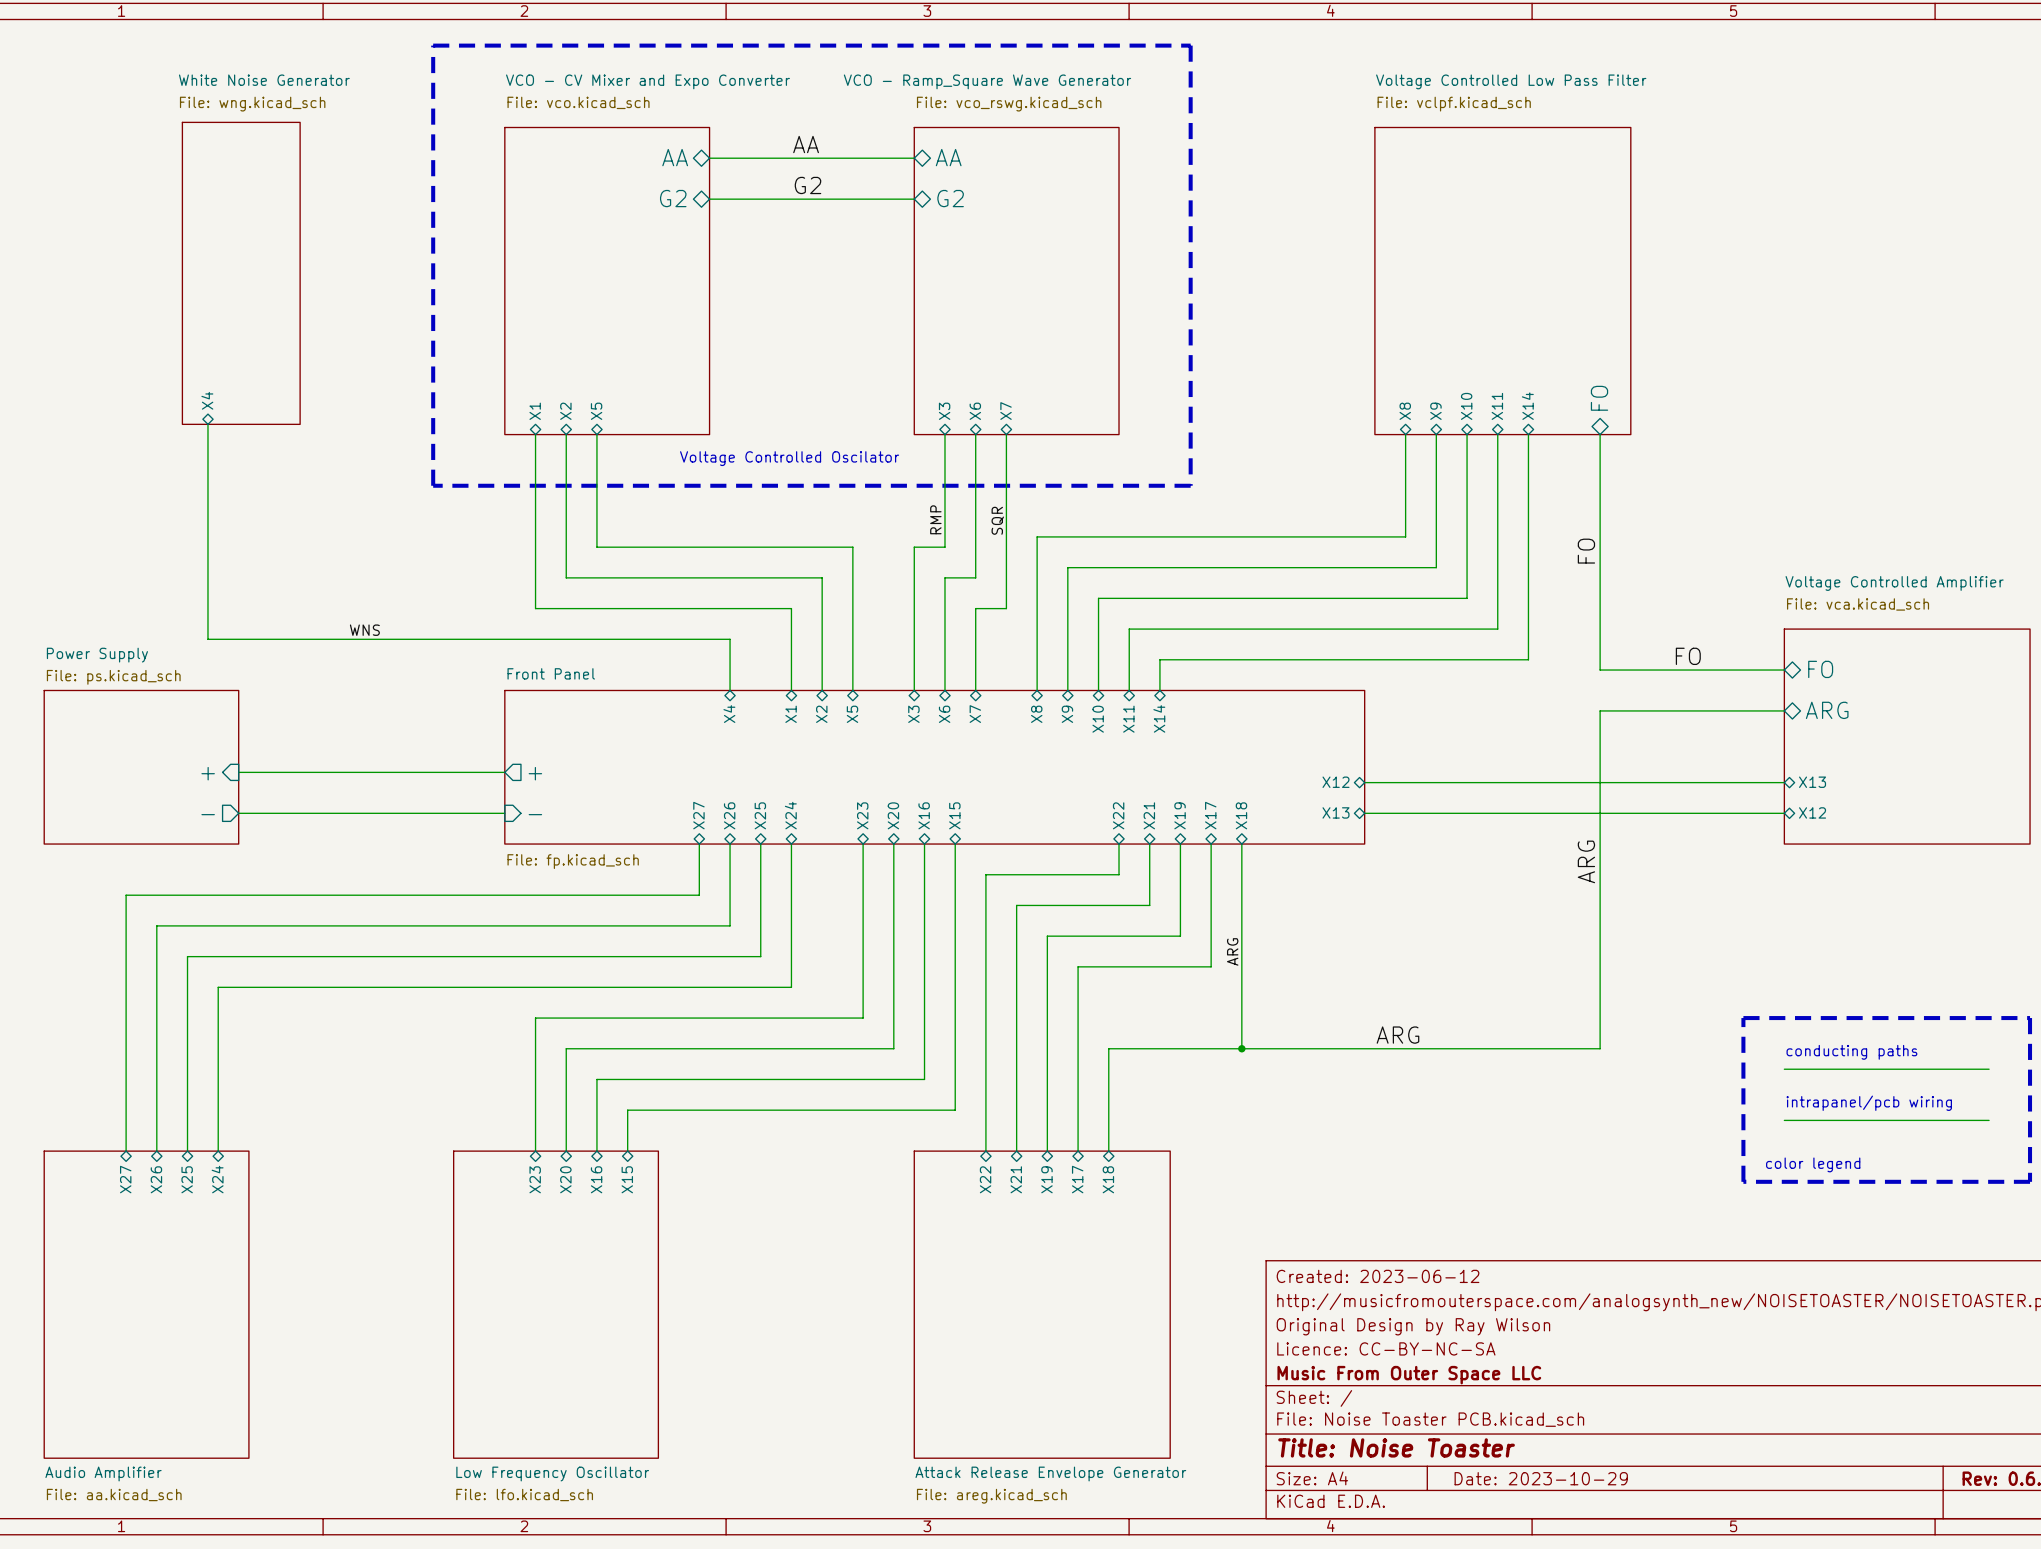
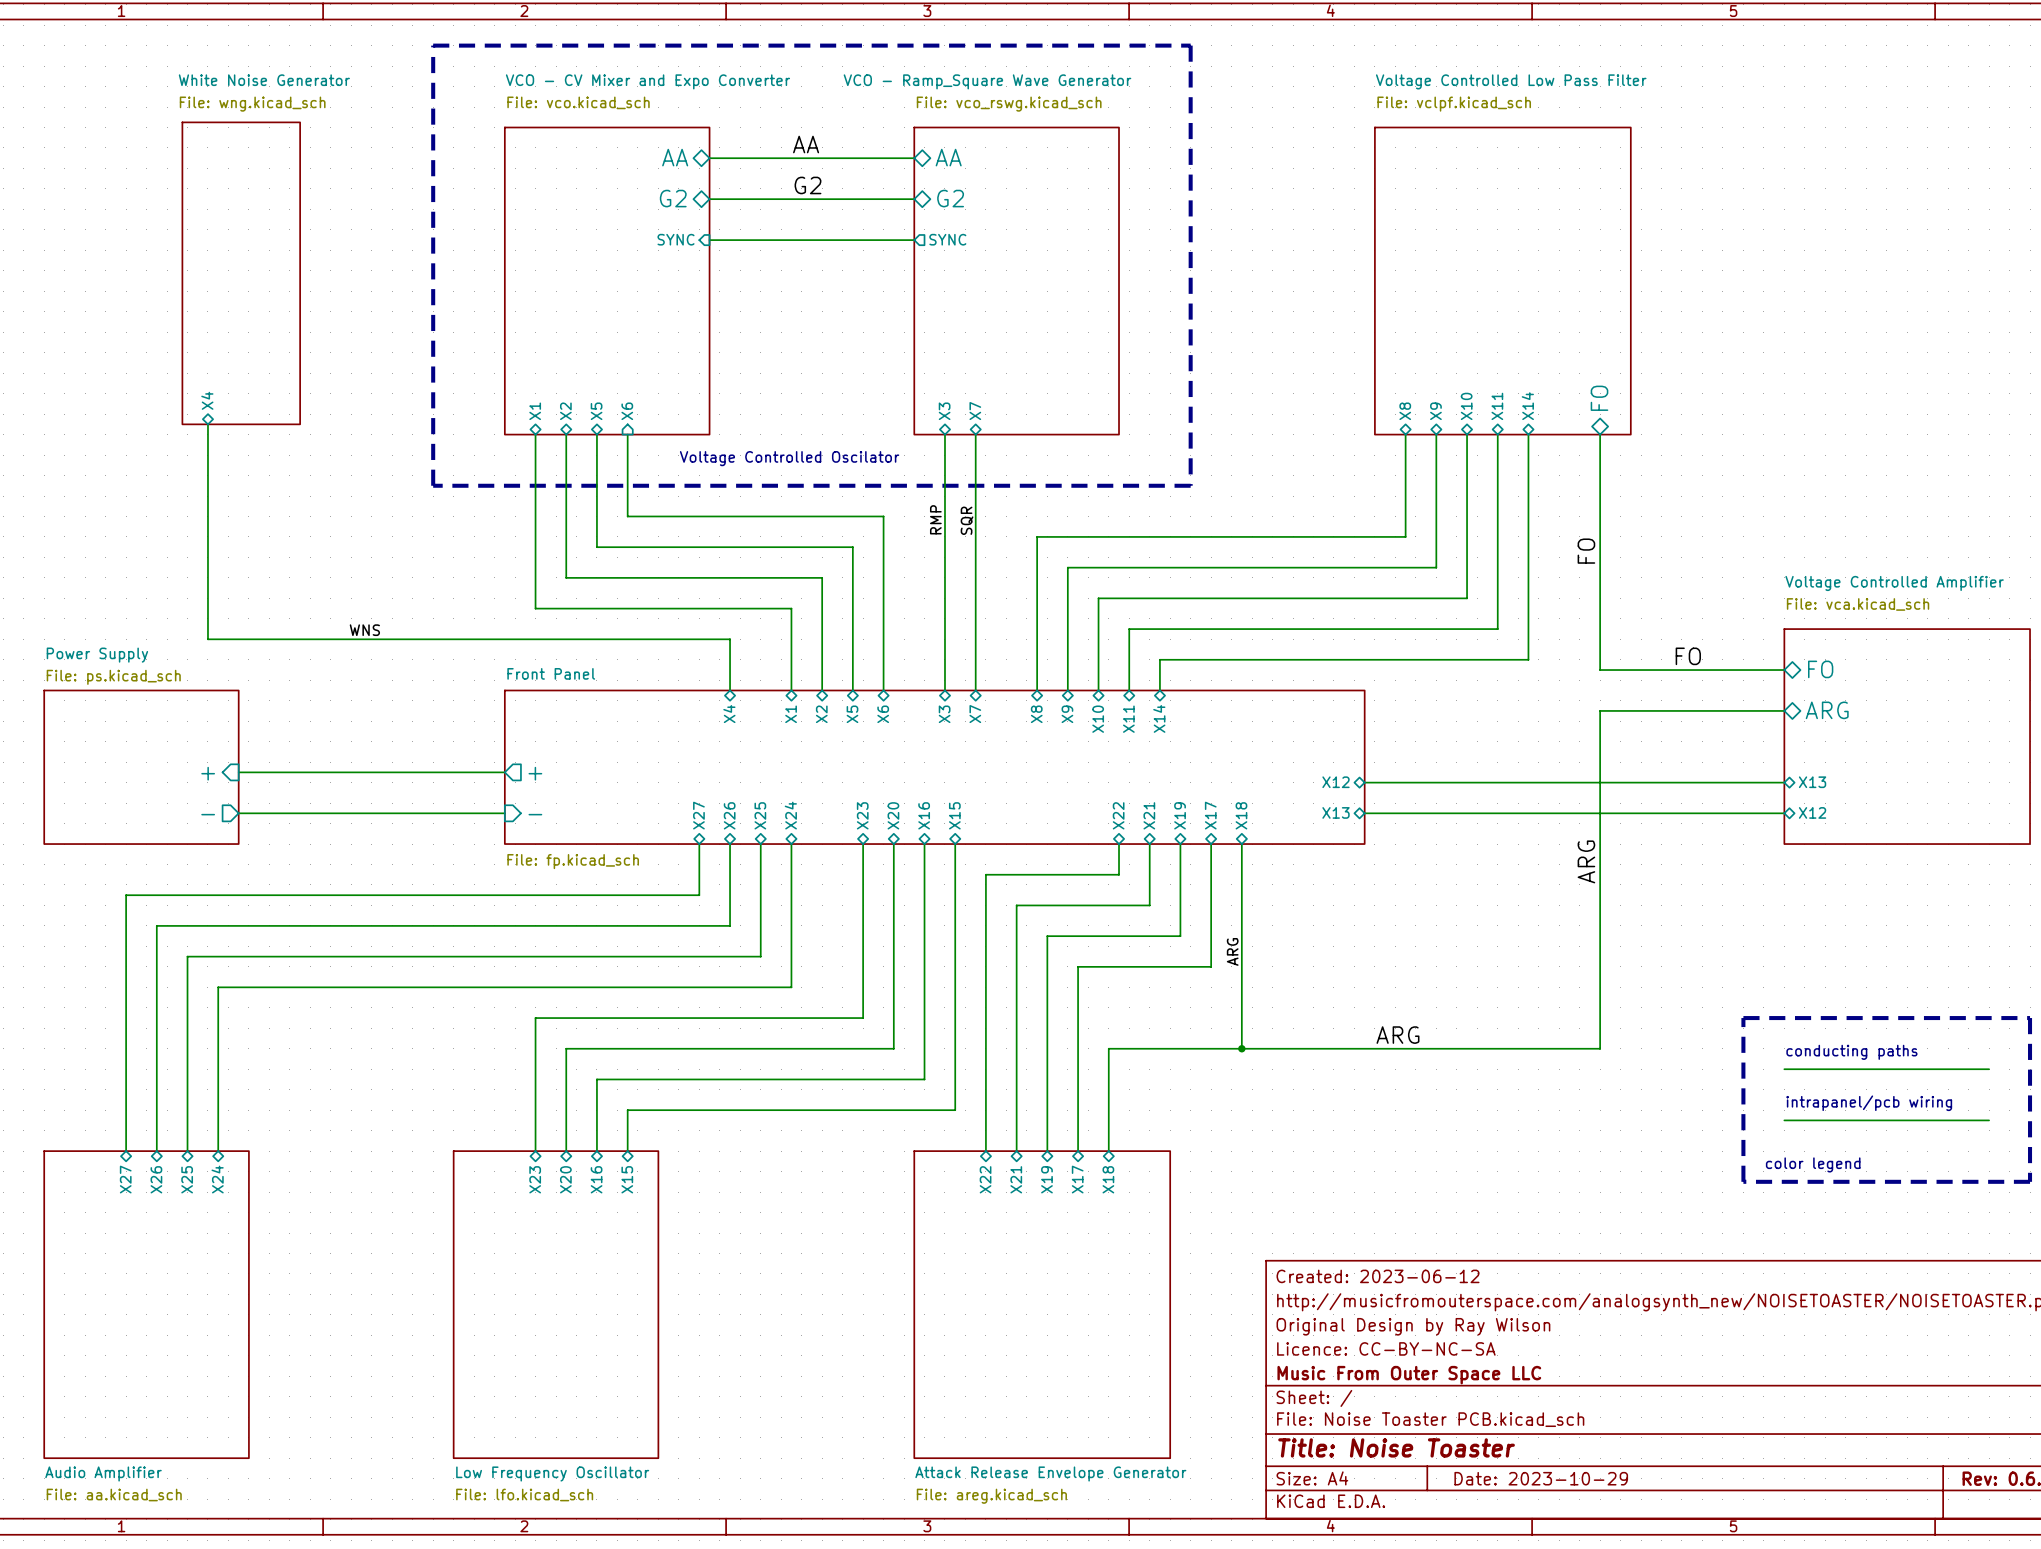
sheet pin: none -> SYNC (676, 239)
sheet pin: none -> SYNC (947, 239)
wire: none -> (709, 240) (914, 240)
sheet pin: none -> X6 (627, 411)
sheet pin: X6 (975, 411) -> X7 (975, 411)
sheet pin: X7 (1006, 411) -> none
wire: none -> (627, 434) (627, 516) (883, 516) (883, 690)
wire: (1006, 434) (1006, 608) (975, 608) -> (975, 577) (975, 608)
label position: SQR (997, 520) -> SQR (967, 520)
wire: (944, 547) (914, 547) (914, 690) -> none
wire: (944, 577) (975, 577) -> (944, 577) (944, 547)
sheet pin: none -> X6 (883, 714)
sheet pin: X3 (913, 714) -> none
sheet pin: X6 (944, 714) -> X3 (944, 714)

